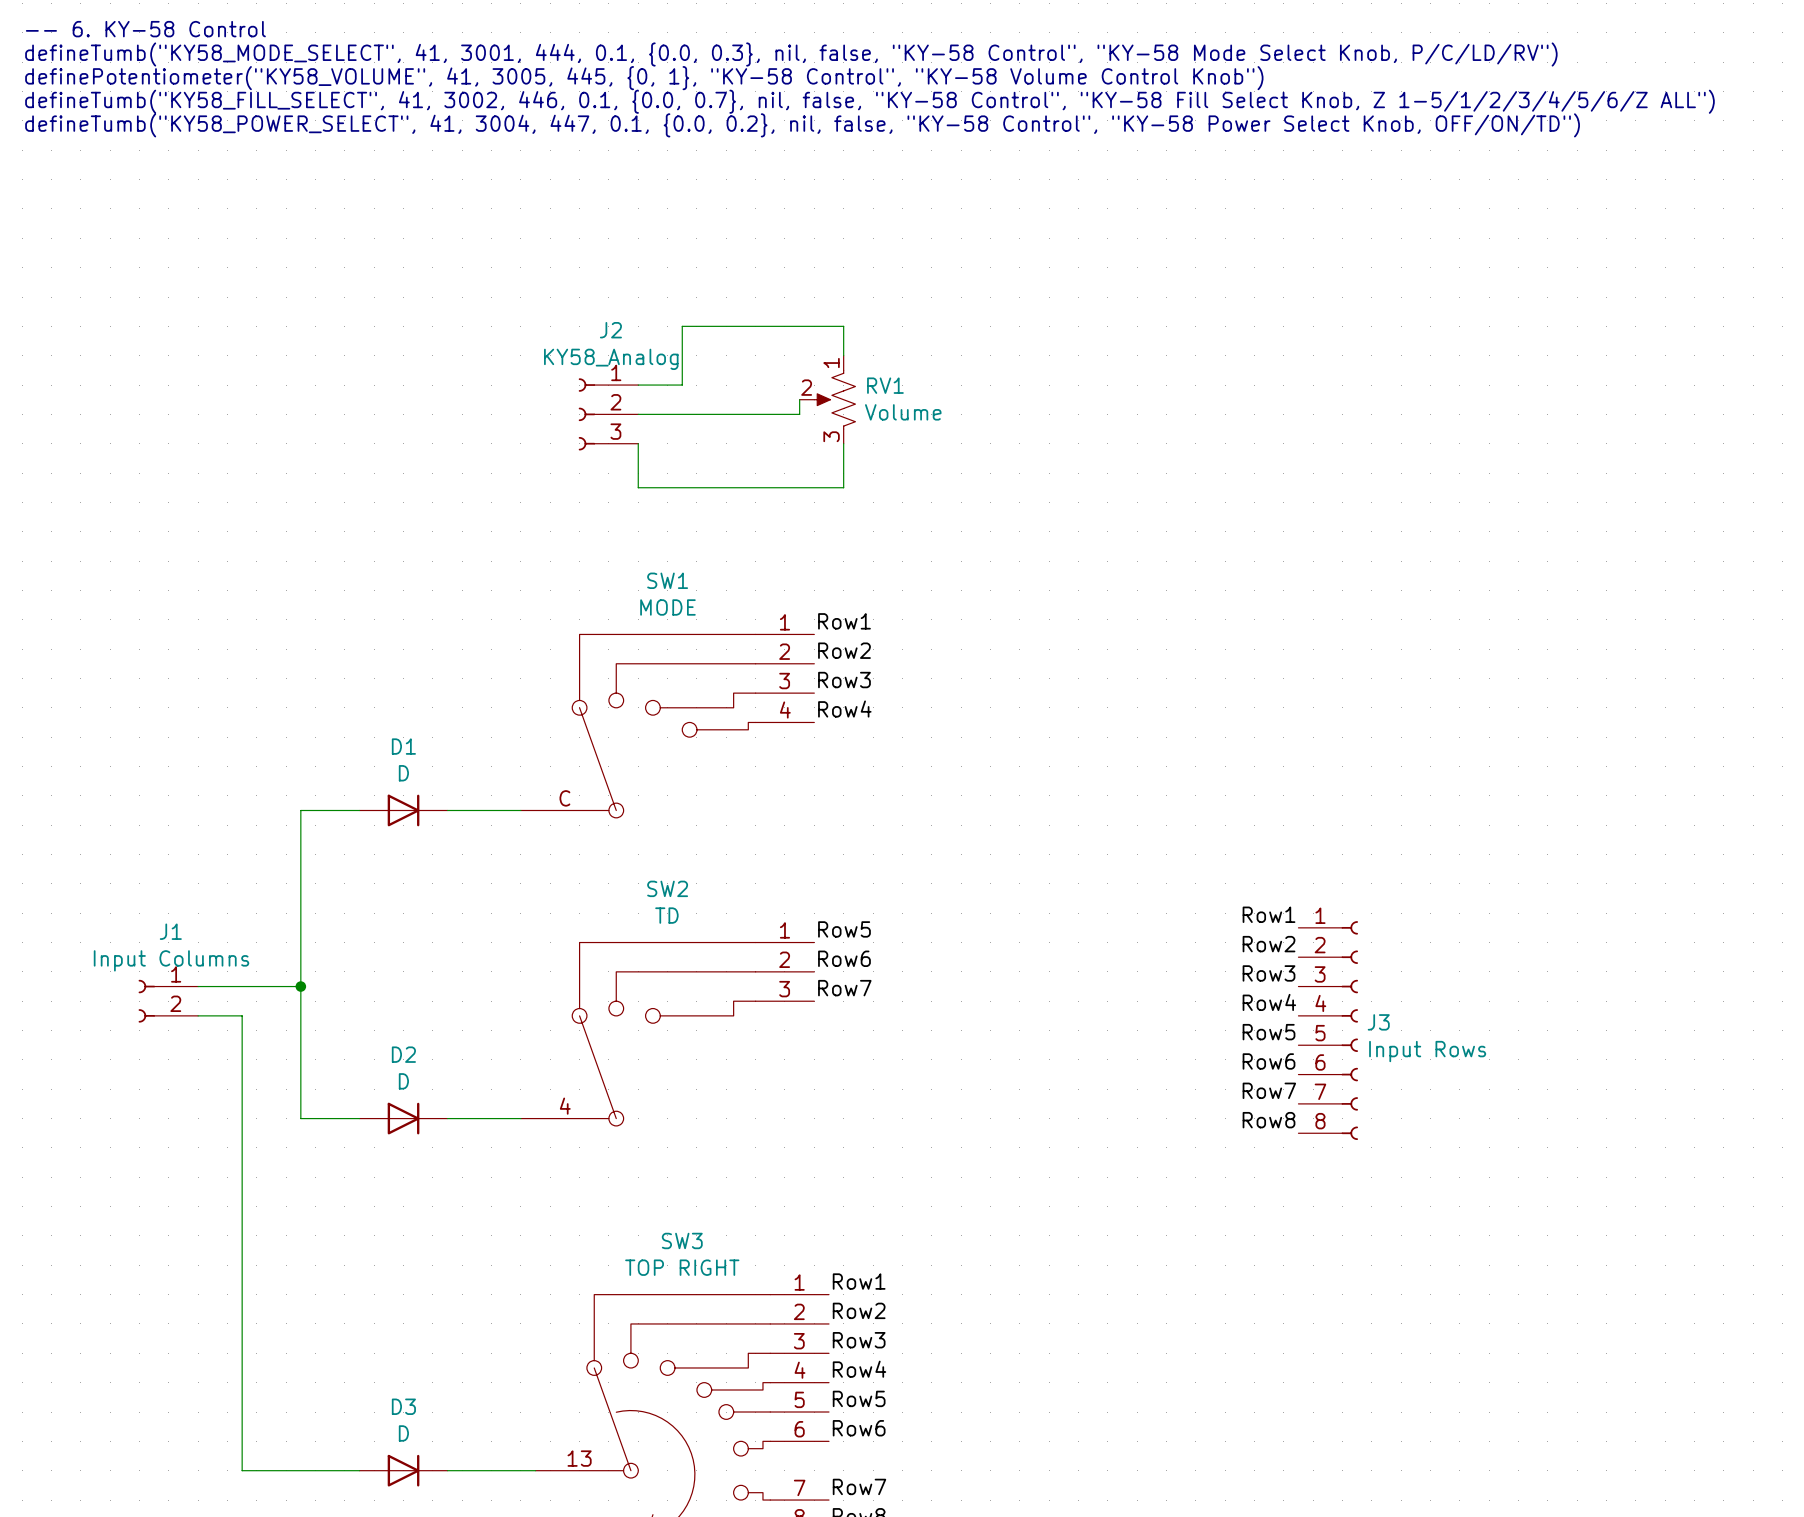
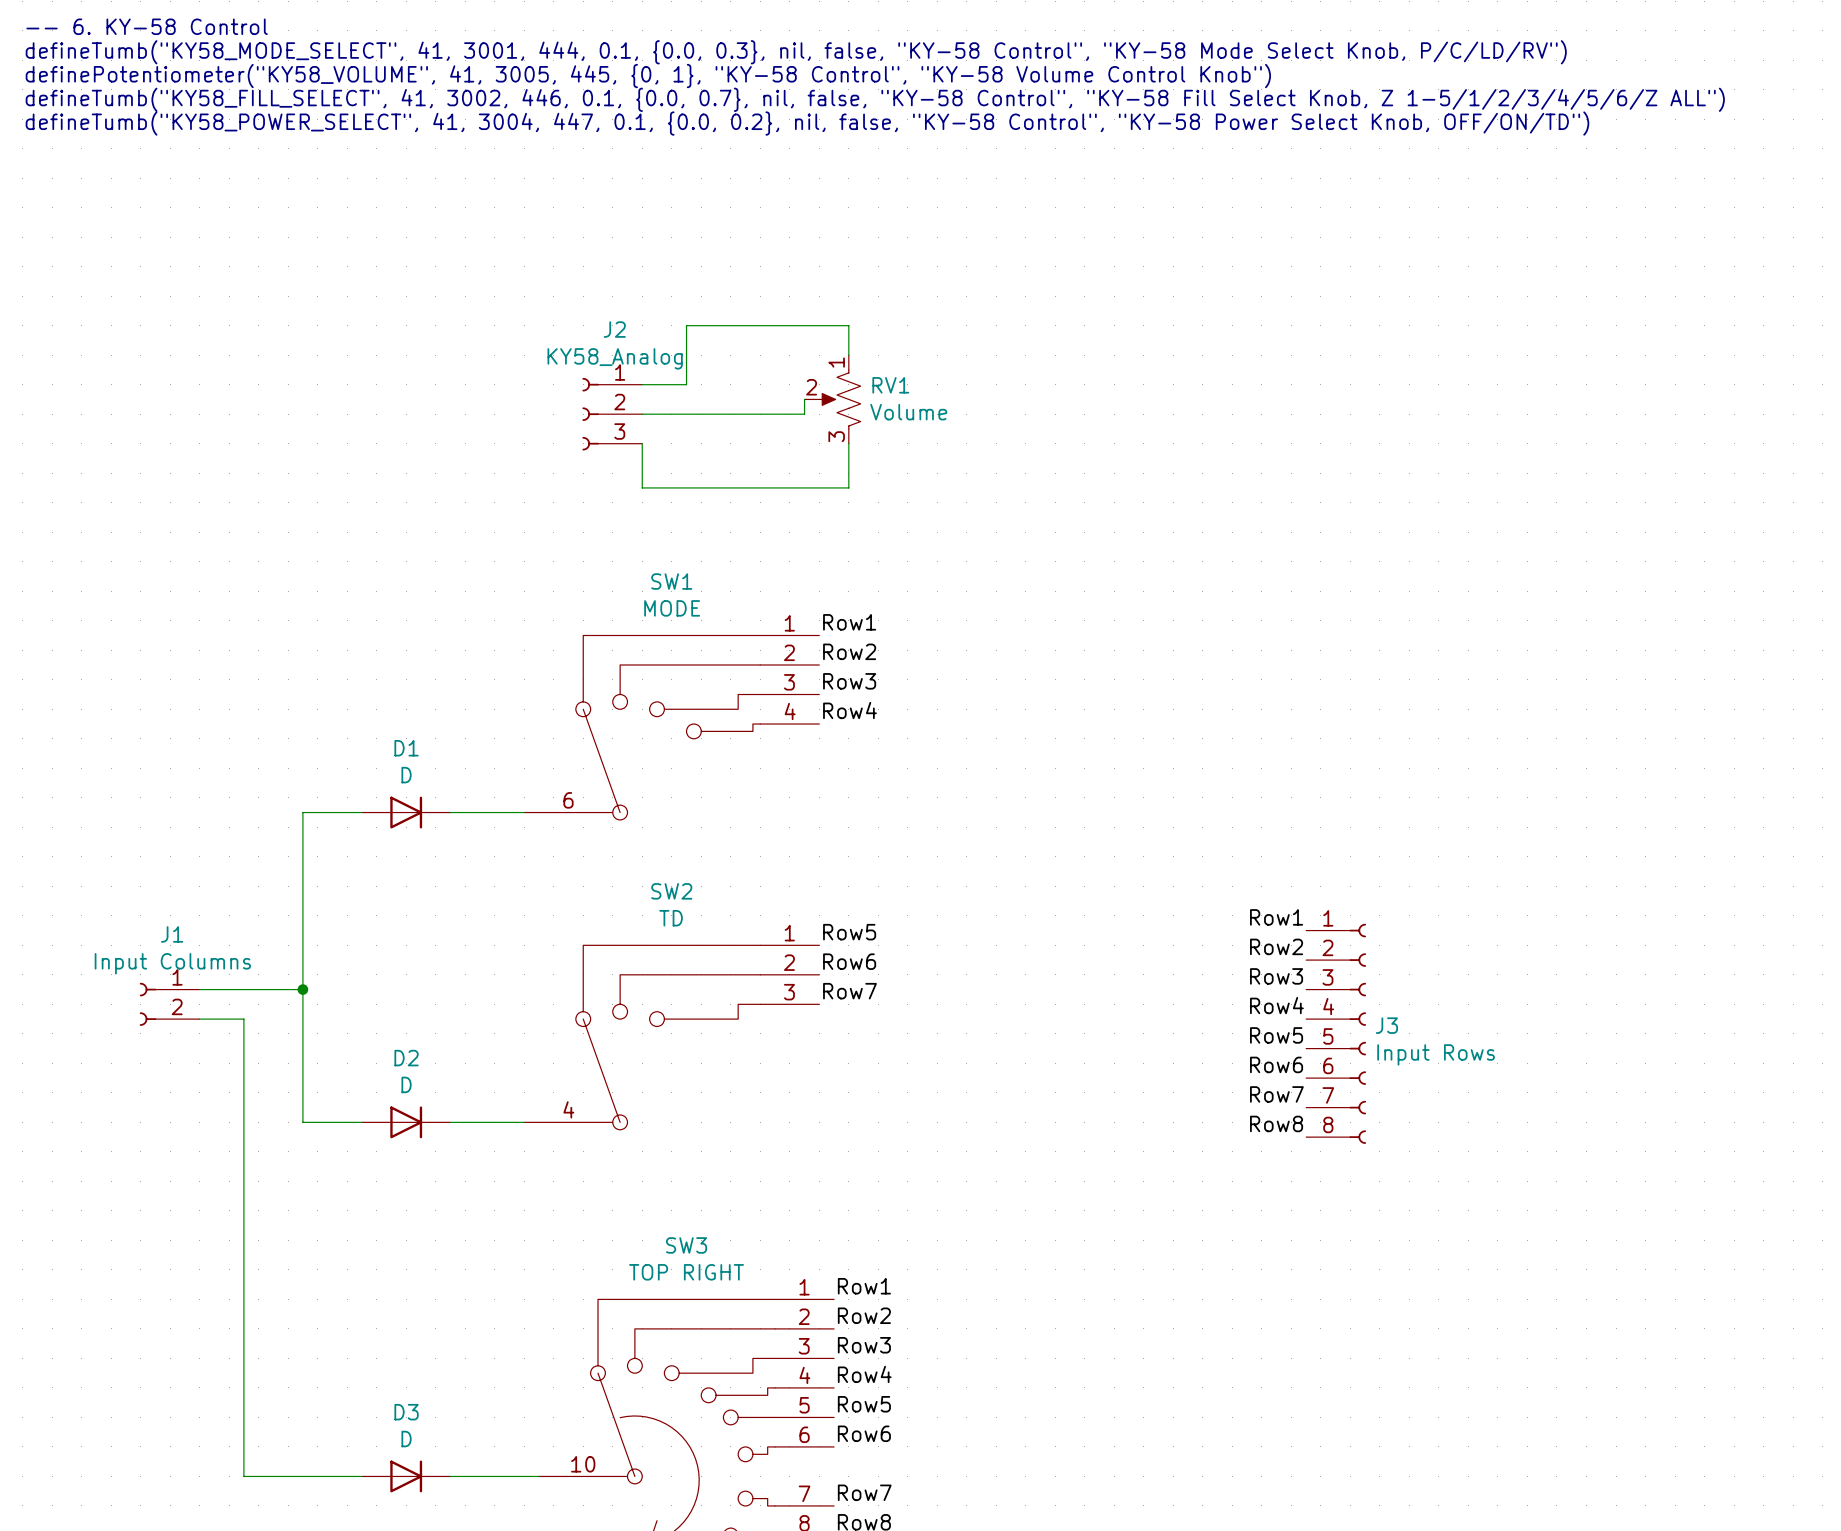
SW1 pin number: C (564, 798) -> 6 (568, 800)
SW3 pin number: 13 (579, 1458) -> 10 (583, 1464)

